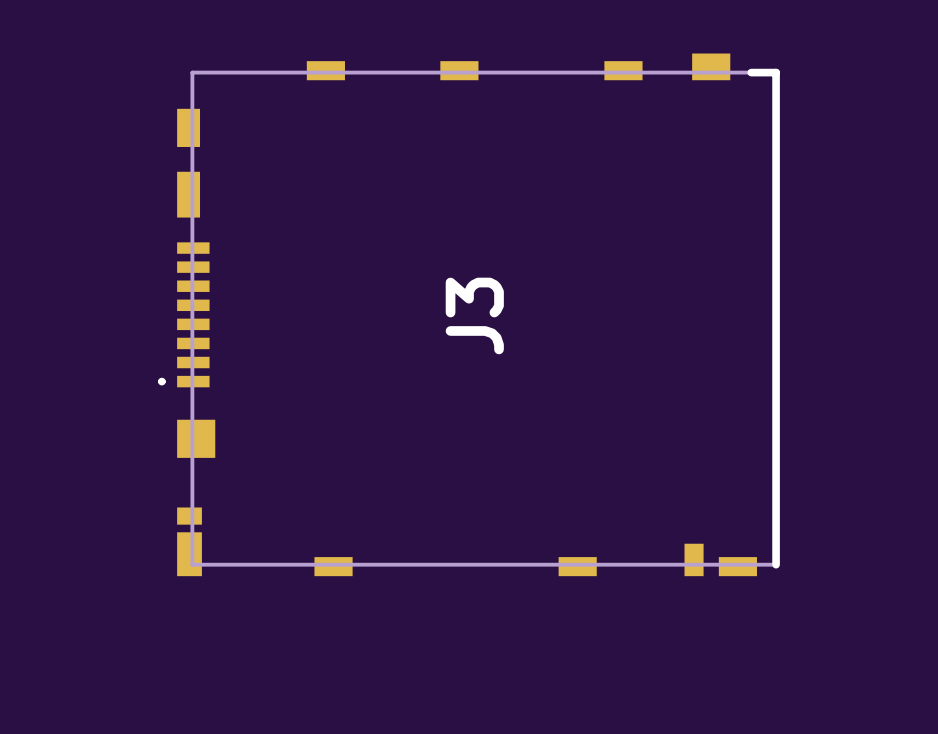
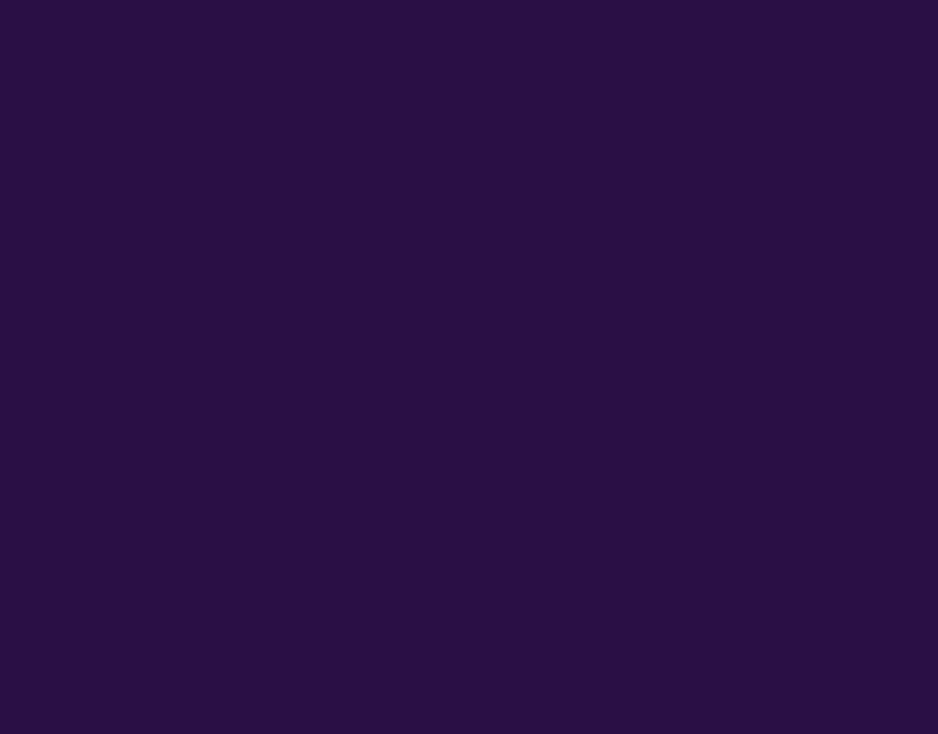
J3: (468, 314) -> none

